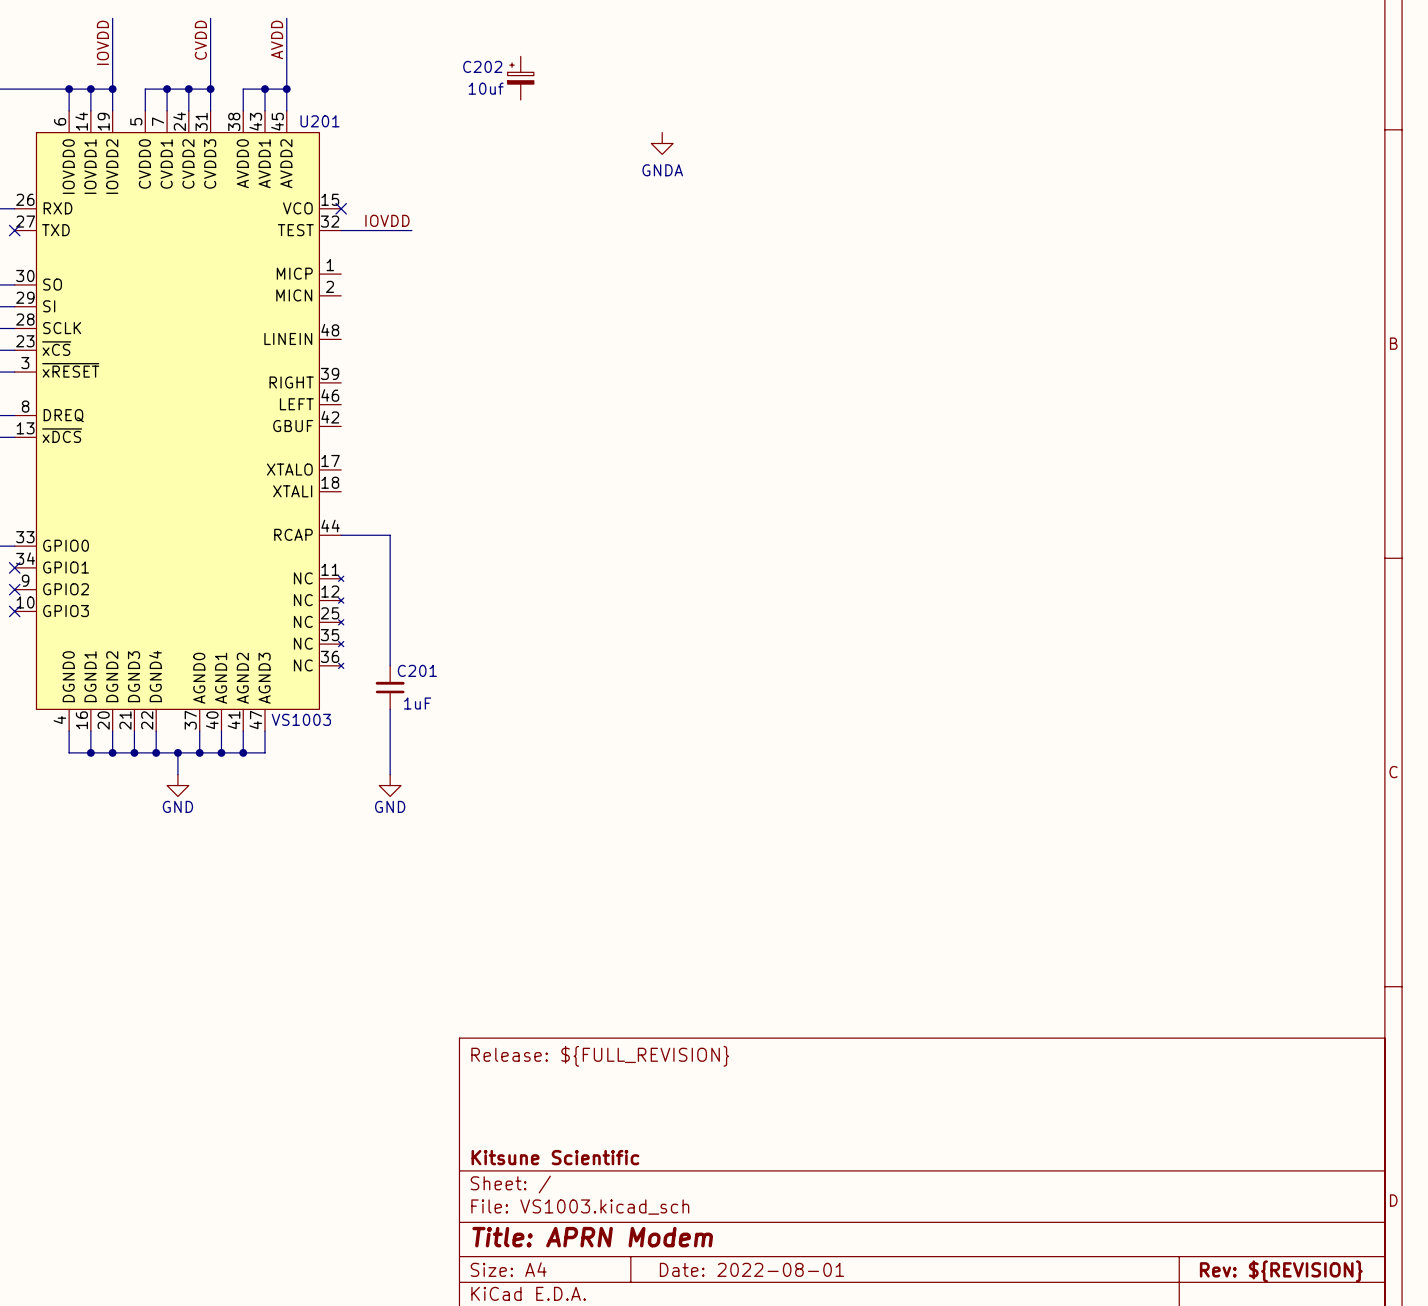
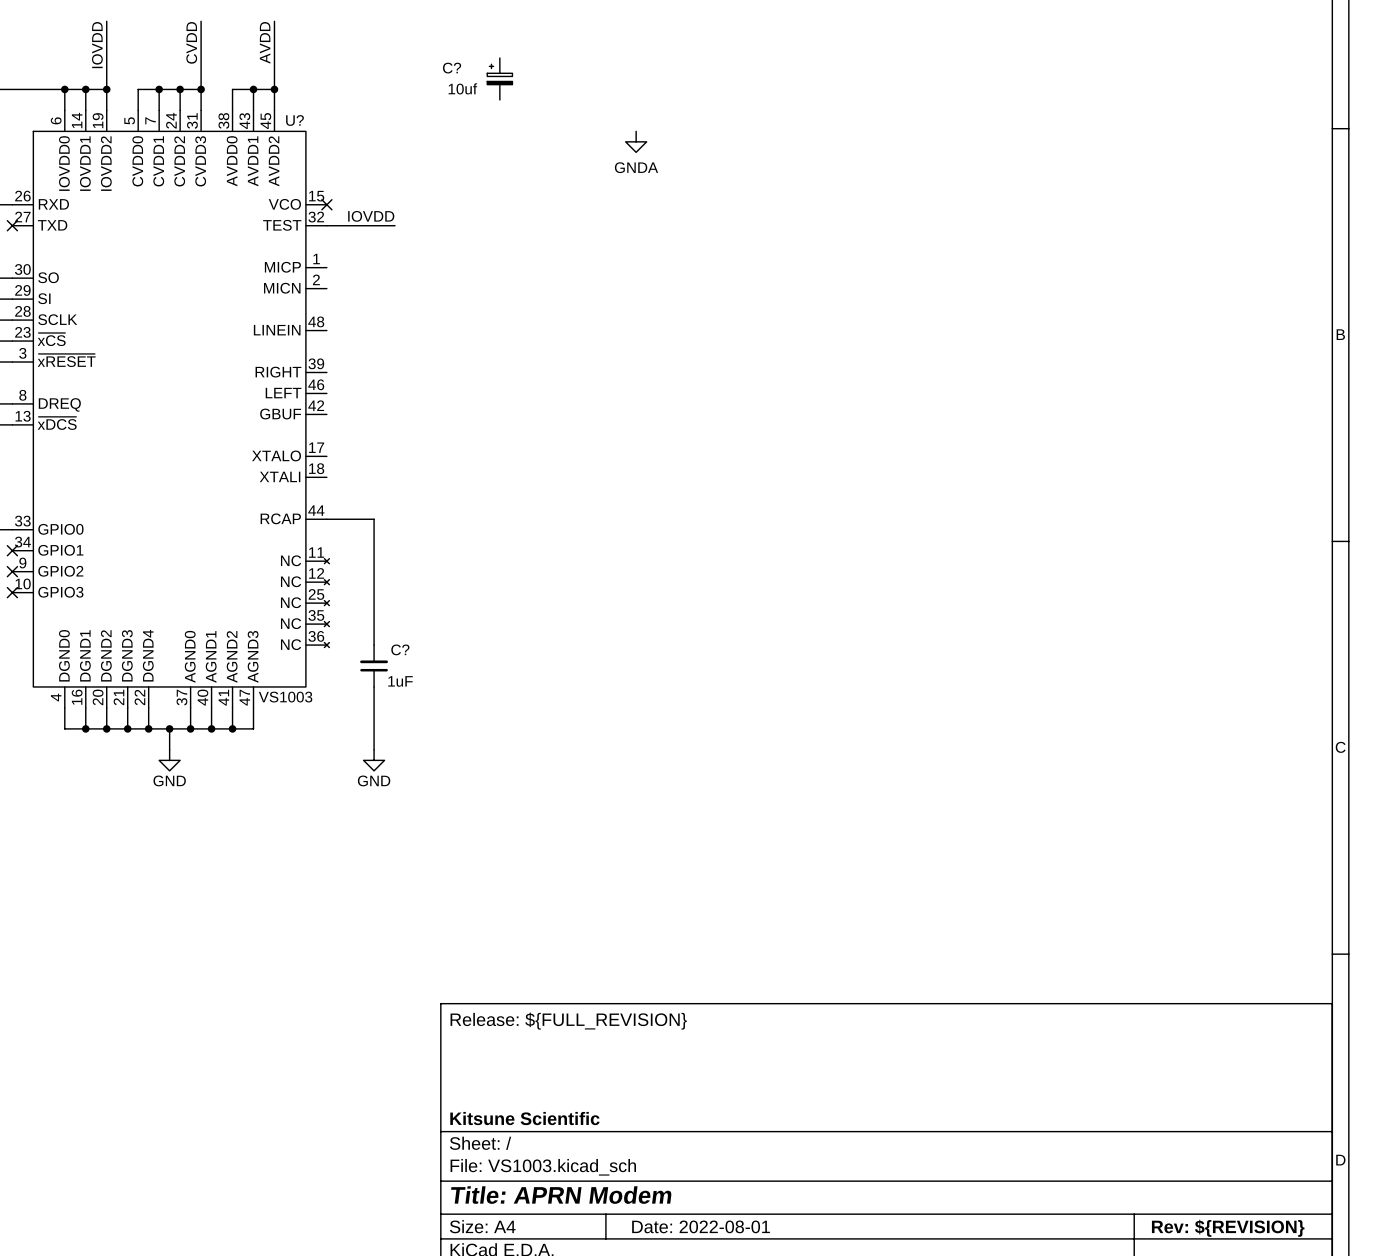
C202 name: C202 (482, 66) -> C? (452, 68)
U201 name: U201 (320, 121) -> U? (295, 120)
C201 name: C201 (417, 670) -> C? (400, 649)

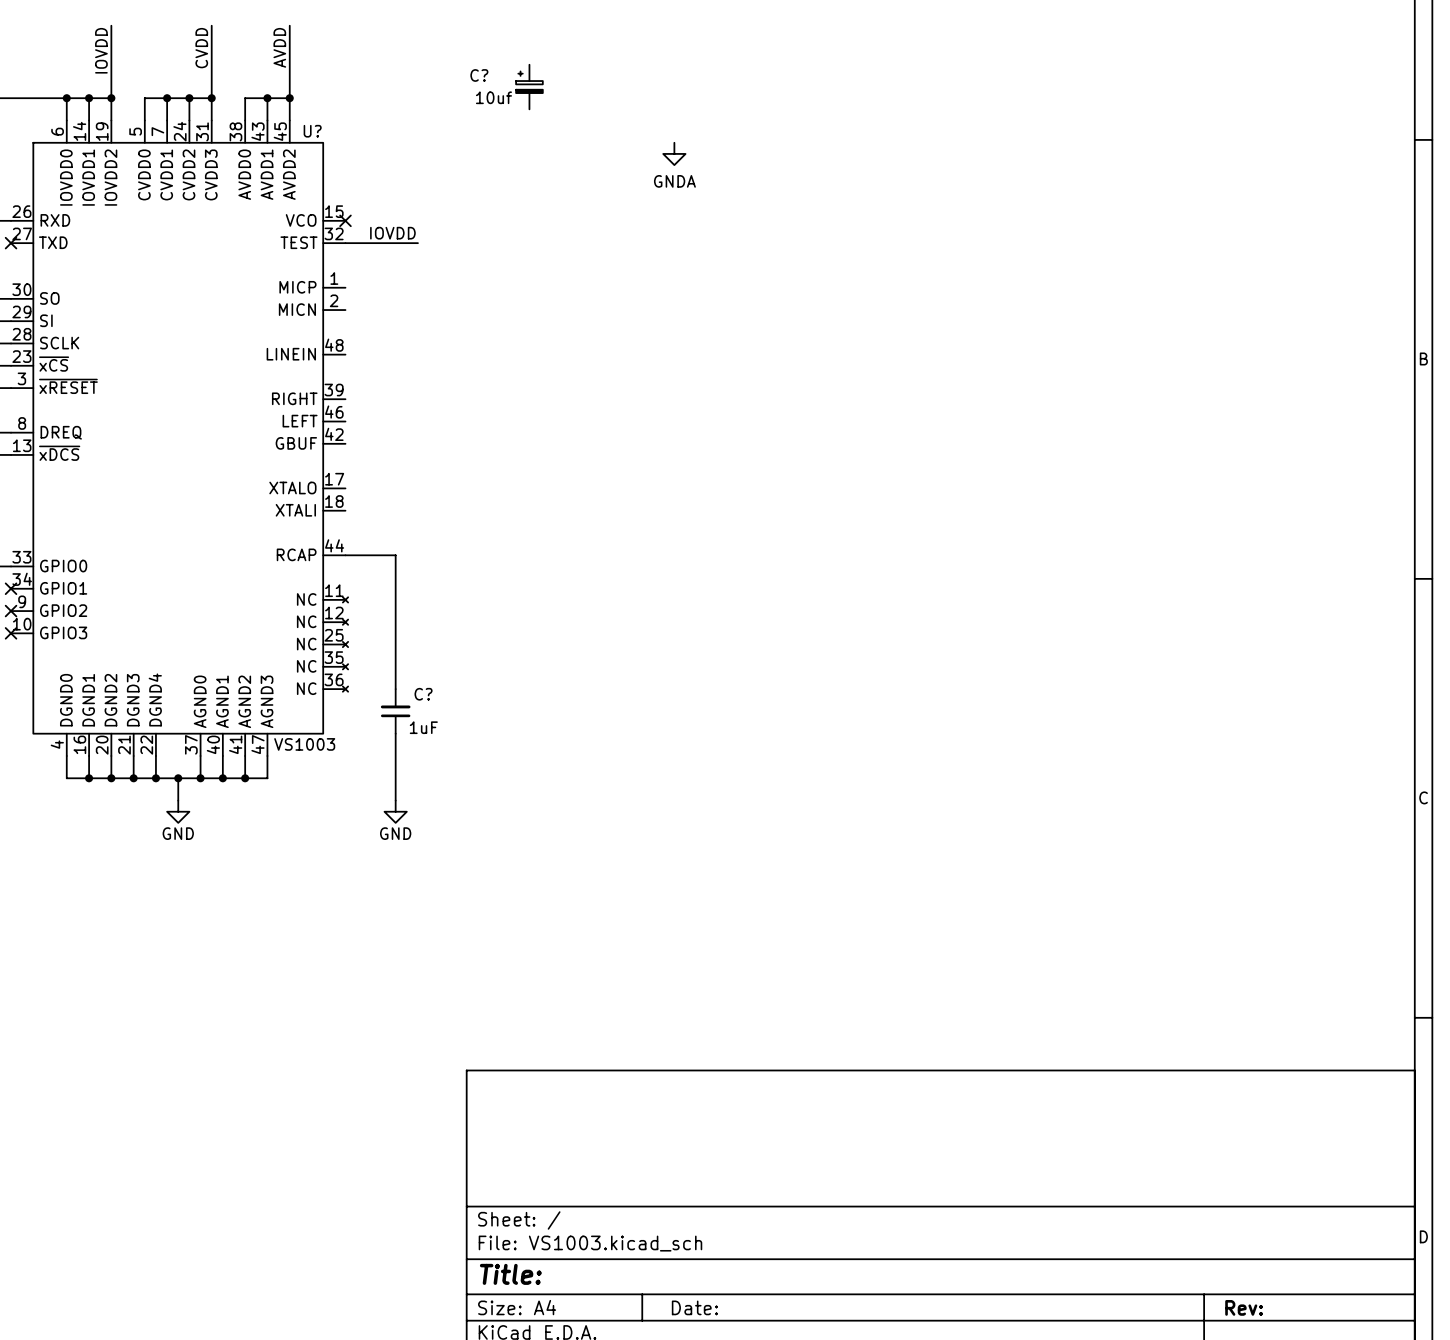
title block: Release: ${FULL_REVISION} (568, 1021) -> none
title block: Kitsune Scientific (524, 1118) -> none
title block: Title: APRN Modem (561, 1195) -> Title: (510, 1274)
title block: Date: 2022-08-01 (701, 1226) -> Date: (694, 1307)
title block: Rev: ${REVISION} (1228, 1228) -> Rev: (1244, 1307)

